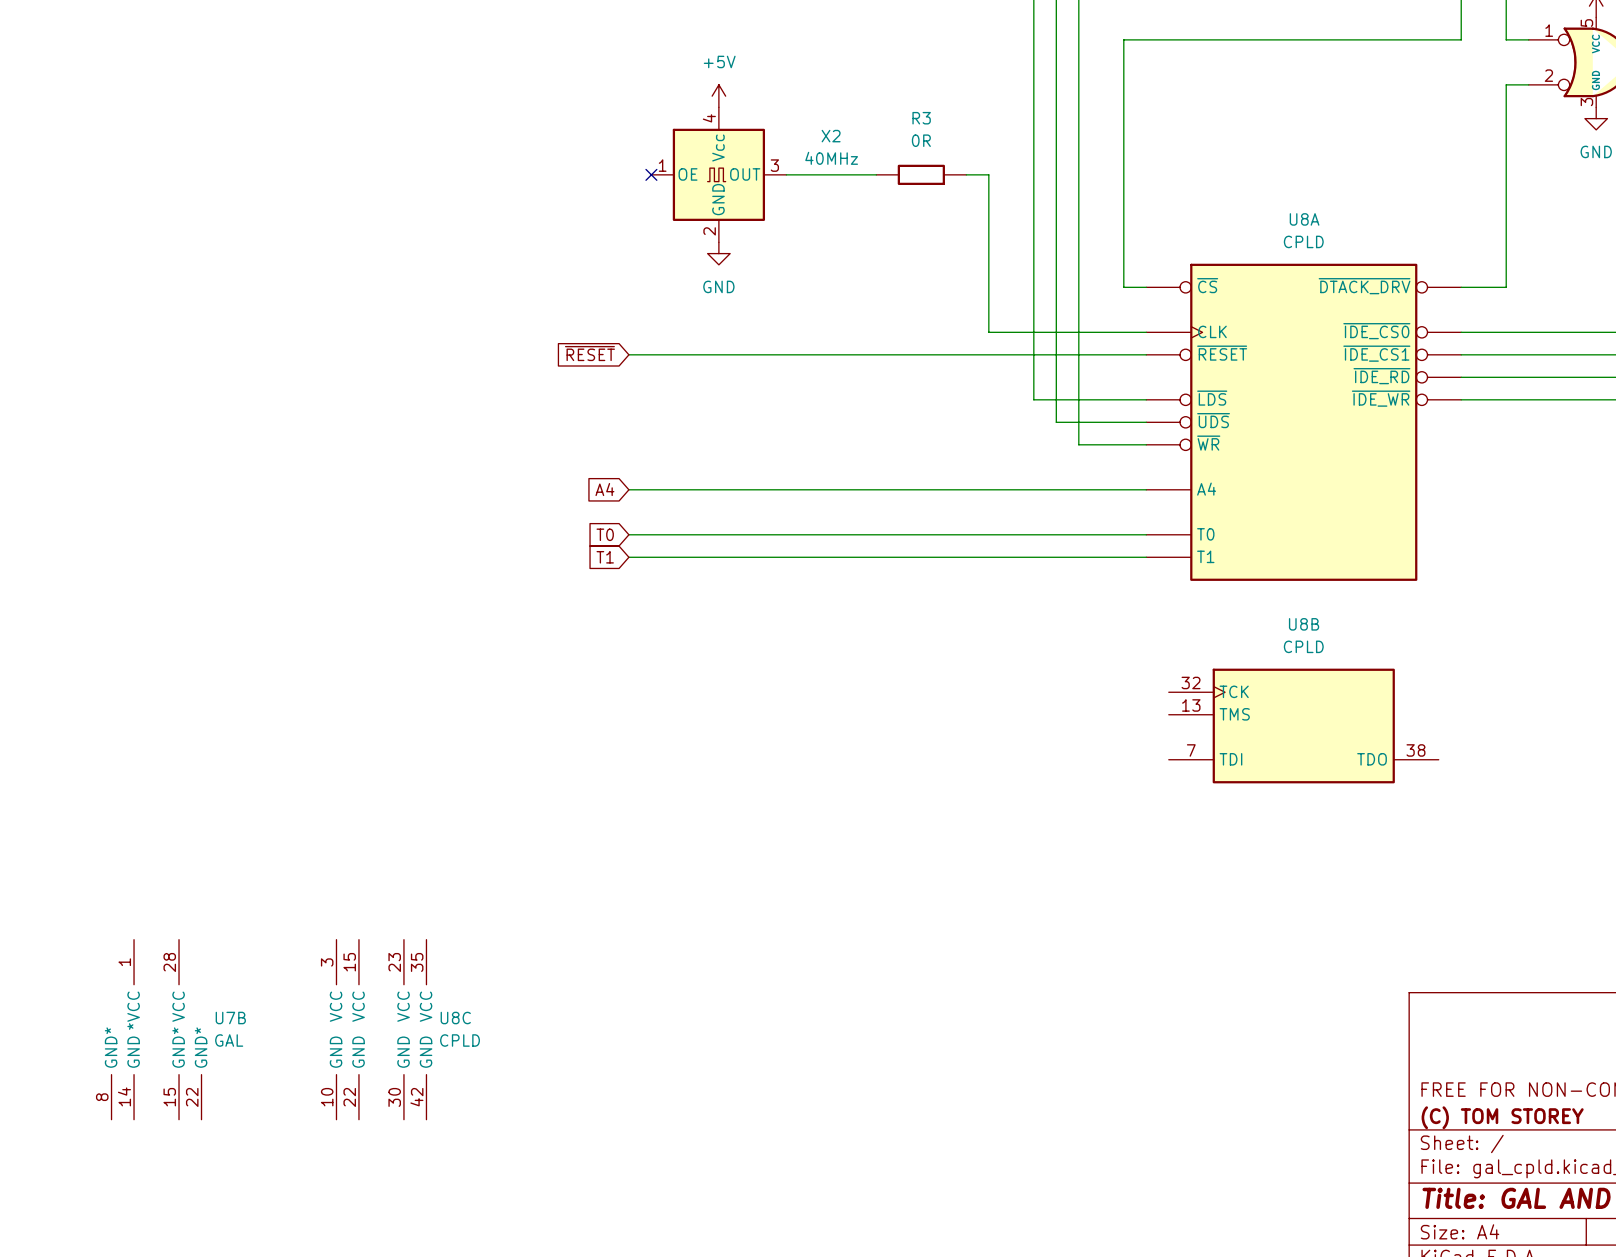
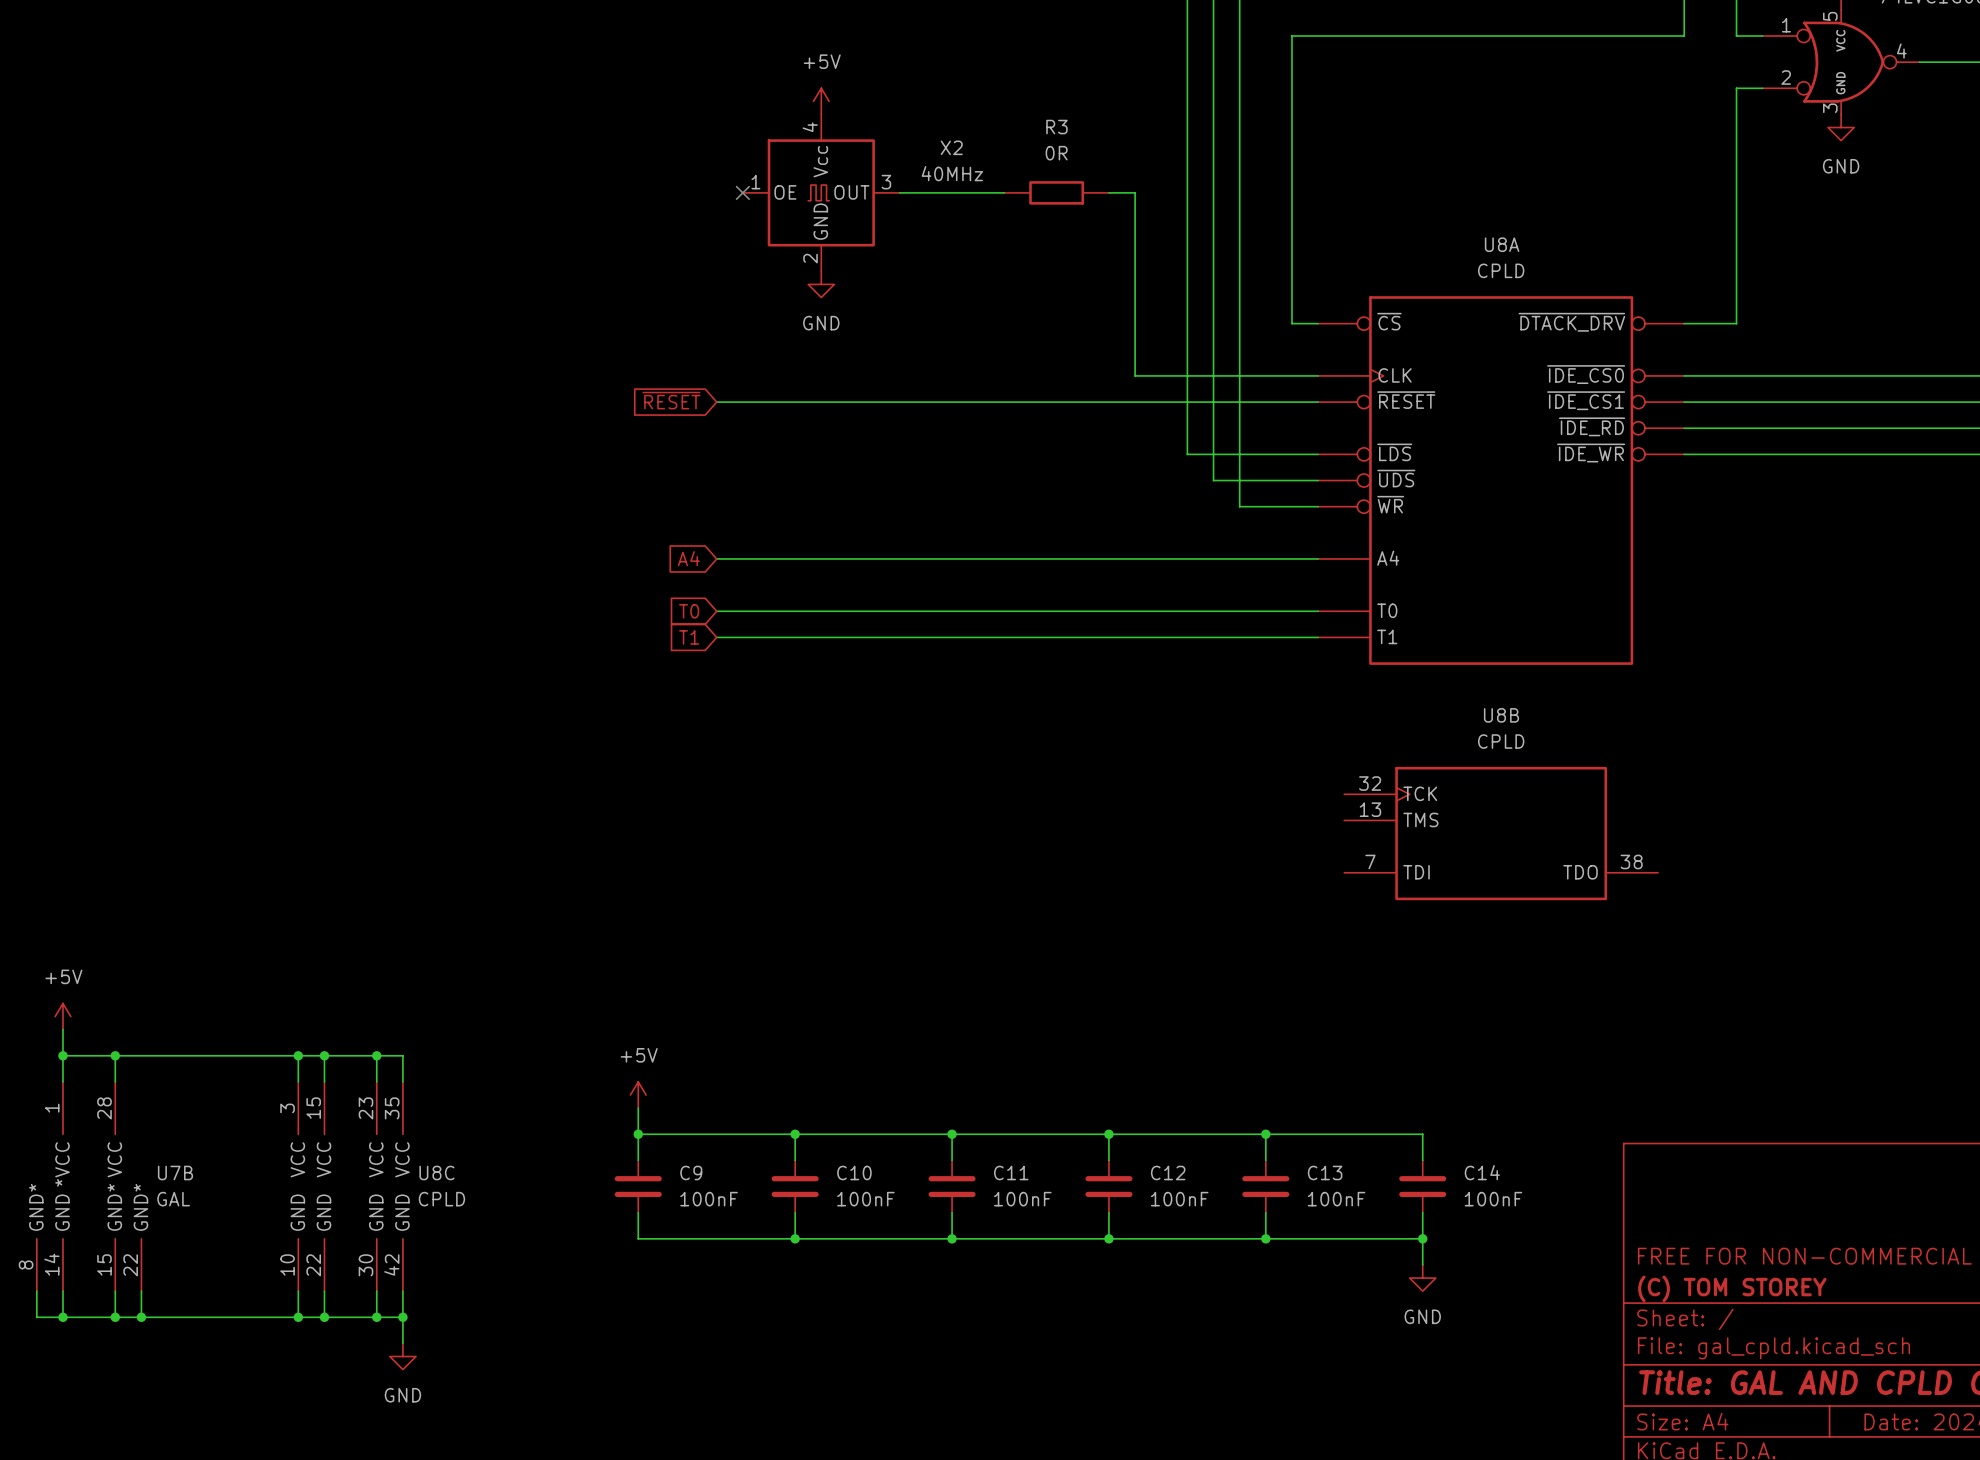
power symbol: none -> +5V (62, 1016)
wire: none -> (62, 1029) (62, 1081)
wire: none -> (62, 1055) (402, 1055) (402, 1081)
junction: none -> (62, 1055)
wire: none -> (115, 1055) (115, 1081)
junction: none -> (115, 1055)
wire: none -> (298, 1055) (298, 1081)
junction: none -> (298, 1055)
wire: none -> (324, 1055) (324, 1081)
junction: none -> (324, 1055)
wire: none -> (376, 1055) (376, 1081)
junction: none -> (376, 1055)
power symbol: none -> +5V (638, 1095)
wire: none -> (638, 1108) (638, 1160)
wire: none -> (638, 1134) (1422, 1134) (1422, 1160)
junction: none -> (638, 1134)
wire: none -> (795, 1134) (795, 1160)
junction: none -> (795, 1134)
wire: none -> (952, 1134) (952, 1160)
junction: none -> (952, 1134)
wire: none -> (1108, 1134) (1108, 1160)
junction: none -> (1108, 1134)
wire: none -> (1265, 1134) (1265, 1160)
junction: none -> (1265, 1134)
U7B position: (156, 1029) -> (89, 1186)
U8C position: (381, 1029) -> (350, 1186)
C9: none -> 100nF (638, 1186)
C10: none -> 100nF (795, 1186)
C11: none -> 100nF (952, 1186)
C12: none -> 100nF (1108, 1186)
C13: none -> 100nF (1265, 1186)
C14: none -> 100nF (1422, 1186)
wire: none -> (638, 1212) (638, 1238) (1422, 1238)
wire: none -> (795, 1212) (795, 1238)
wire: none -> (952, 1212) (952, 1238)
wire: none -> (1108, 1212) (1108, 1238)
wire: none -> (1265, 1212) (1265, 1238)
wire: none -> (1422, 1212) (1422, 1265)
junction: none -> (795, 1238)
junction: none -> (952, 1238)
junction: none -> (1108, 1238)
junction: none -> (1265, 1238)
junction: none -> (1422, 1238)
power symbol: none -> GND (1422, 1278)
wire: none -> (36, 1291) (36, 1317) (402, 1317)
wire: none -> (62, 1291) (62, 1317)
wire: none -> (115, 1291) (115, 1317)
wire: none -> (141, 1291) (141, 1317)
wire: none -> (298, 1291) (298, 1317)
wire: none -> (324, 1291) (324, 1317)
wire: none -> (376, 1291) (376, 1317)
wire: none -> (402, 1291) (402, 1343)
junction: none -> (62, 1317)
junction: none -> (115, 1317)
junction: none -> (141, 1317)
junction: none -> (298, 1317)
junction: none -> (324, 1317)
junction: none -> (376, 1317)
junction: none -> (402, 1317)
power symbol: none -> GND (402, 1356)

